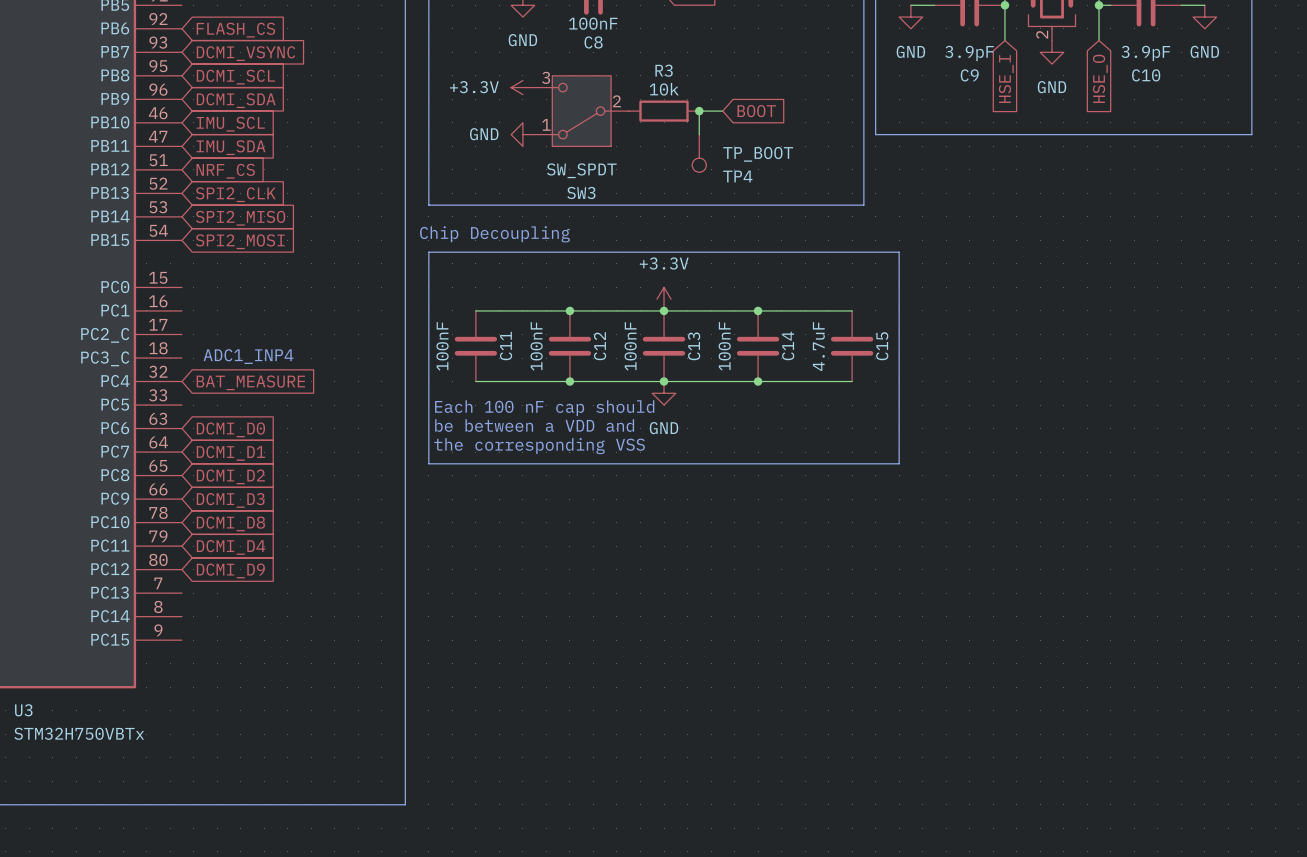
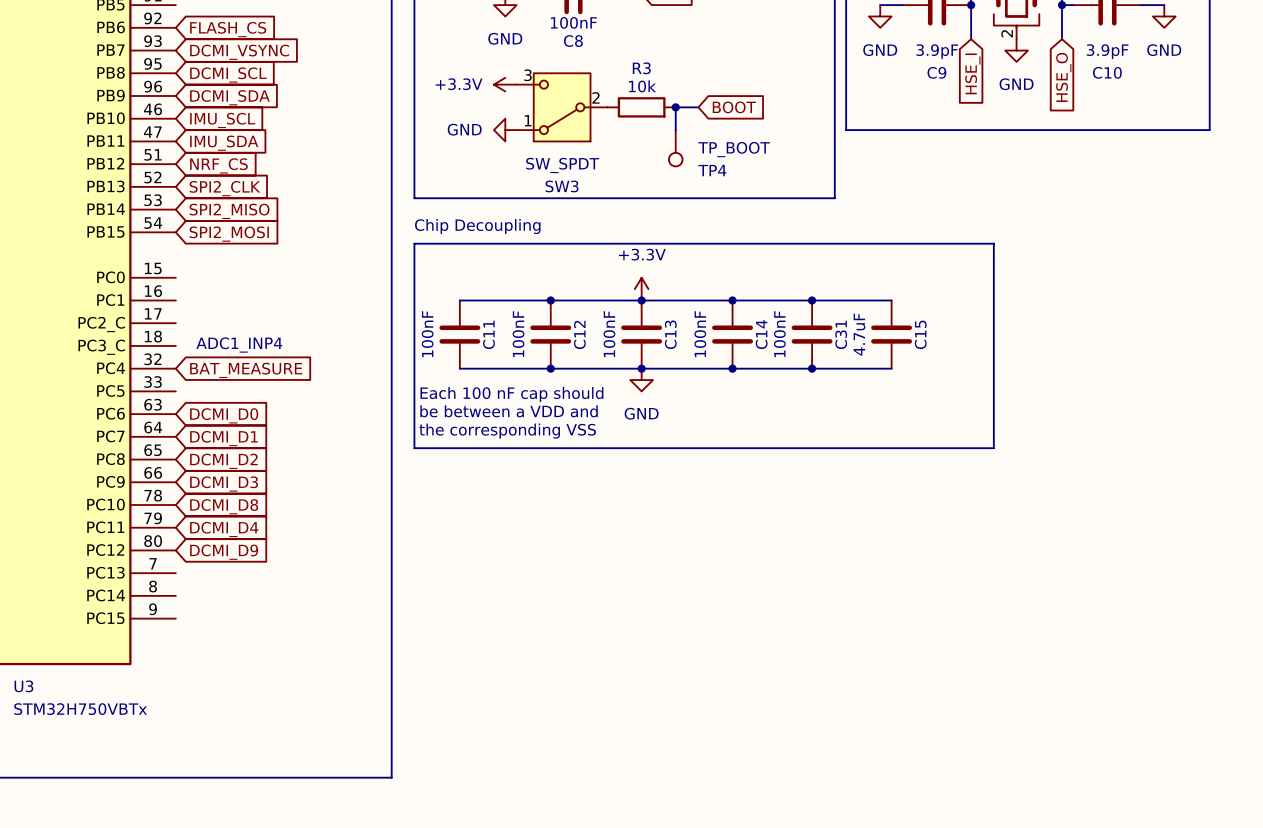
line: (899, 252) (899, 463) -> (868, 243) (993, 243) (993, 448) (868, 448)
junction: none -> (812, 300)
wire: none -> (823, 300) (891, 300)
C31: none -> 100nF (812, 334)
C15 position: (852, 346) -> (891, 334)
junction: none -> (812, 368)
wire: none -> (823, 368) (891, 368)

